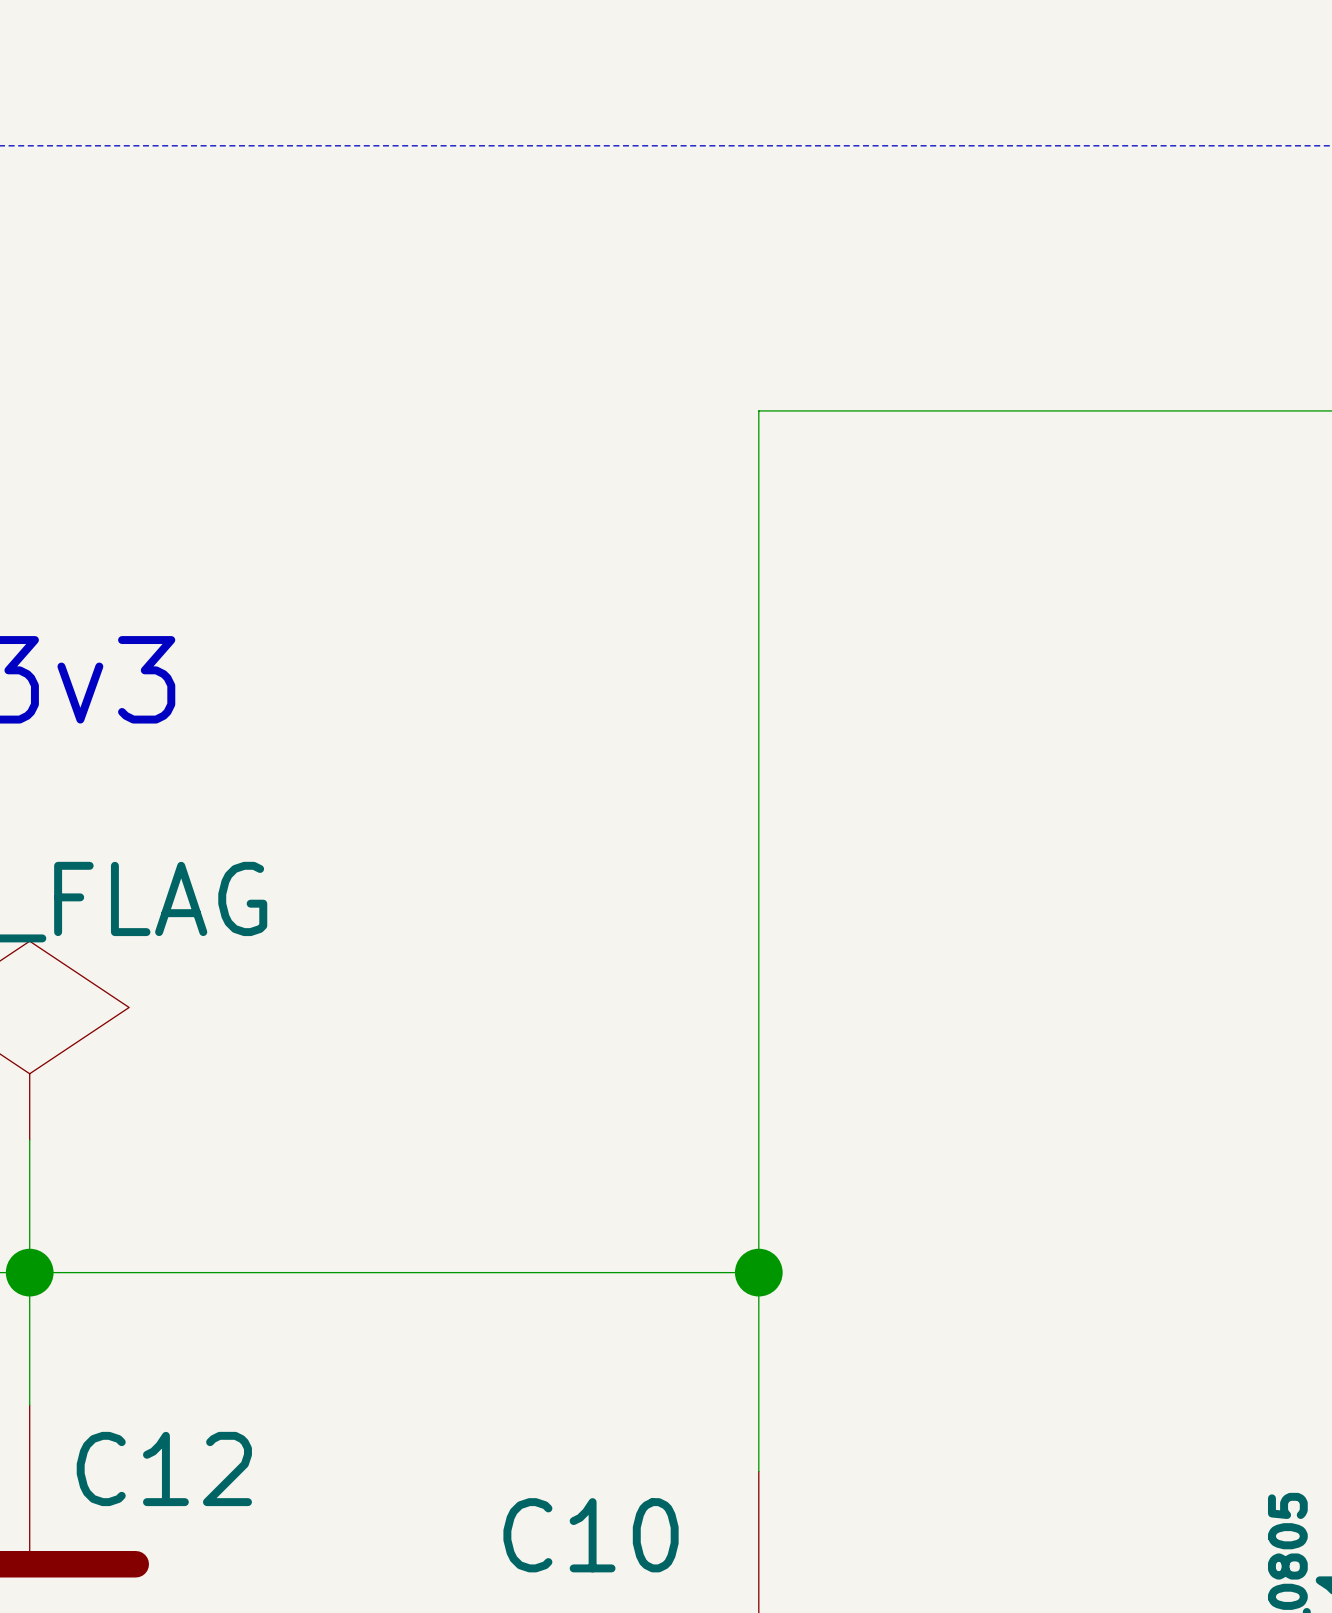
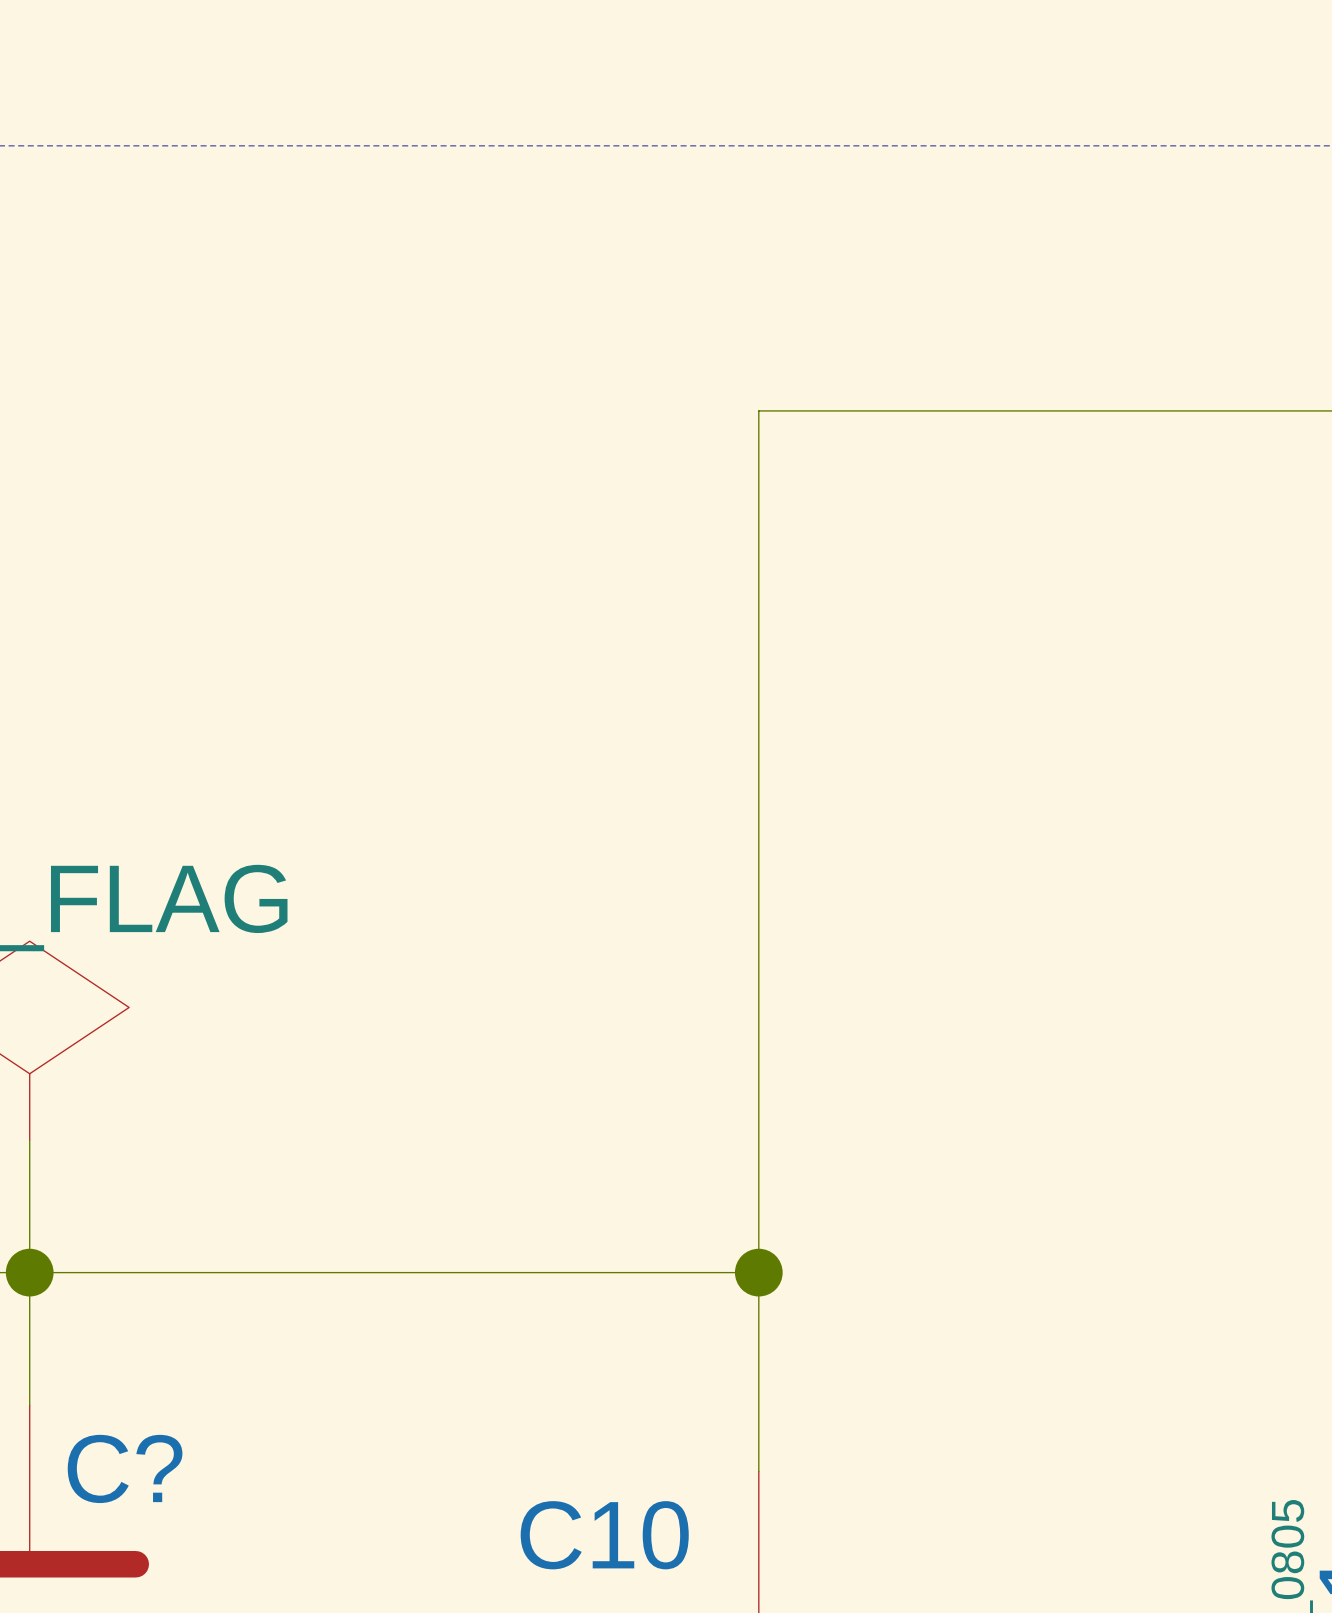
C12 name: C12 (164, 1468) -> C? (125, 1468)

